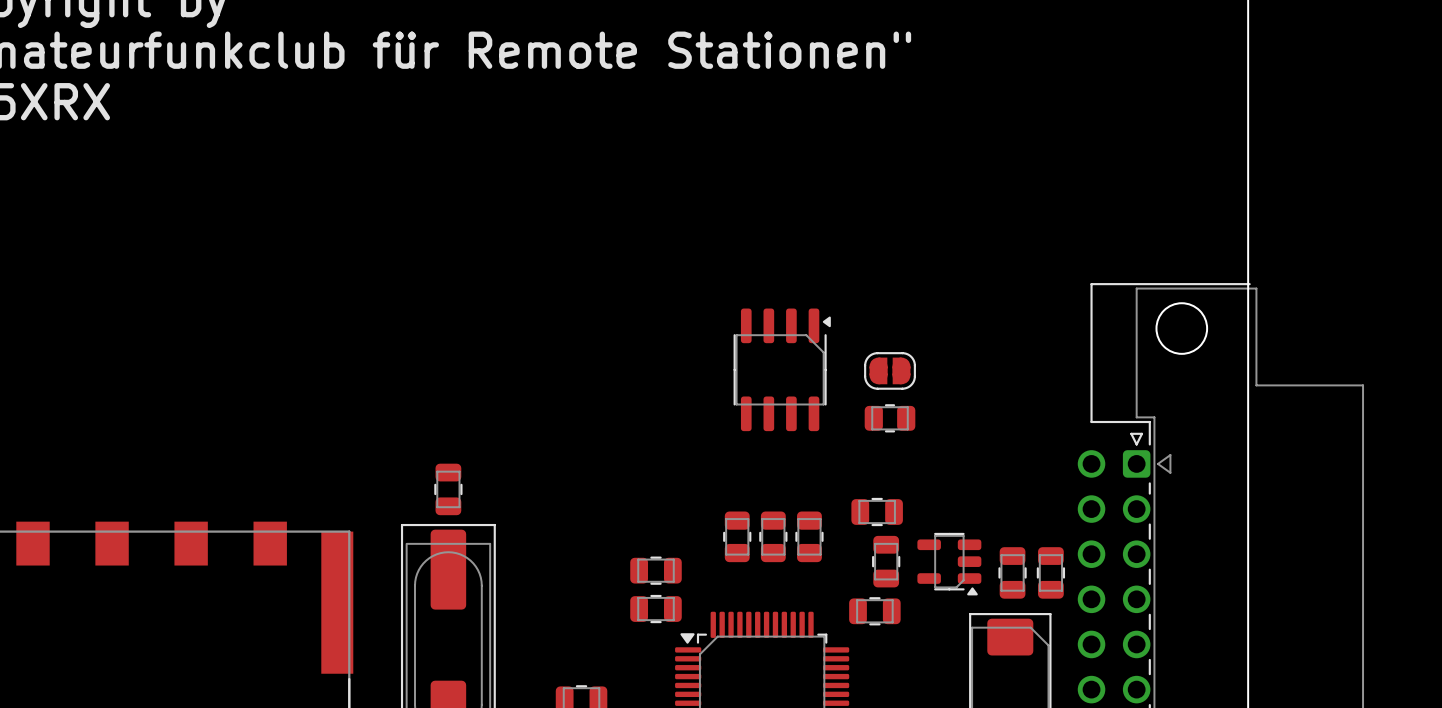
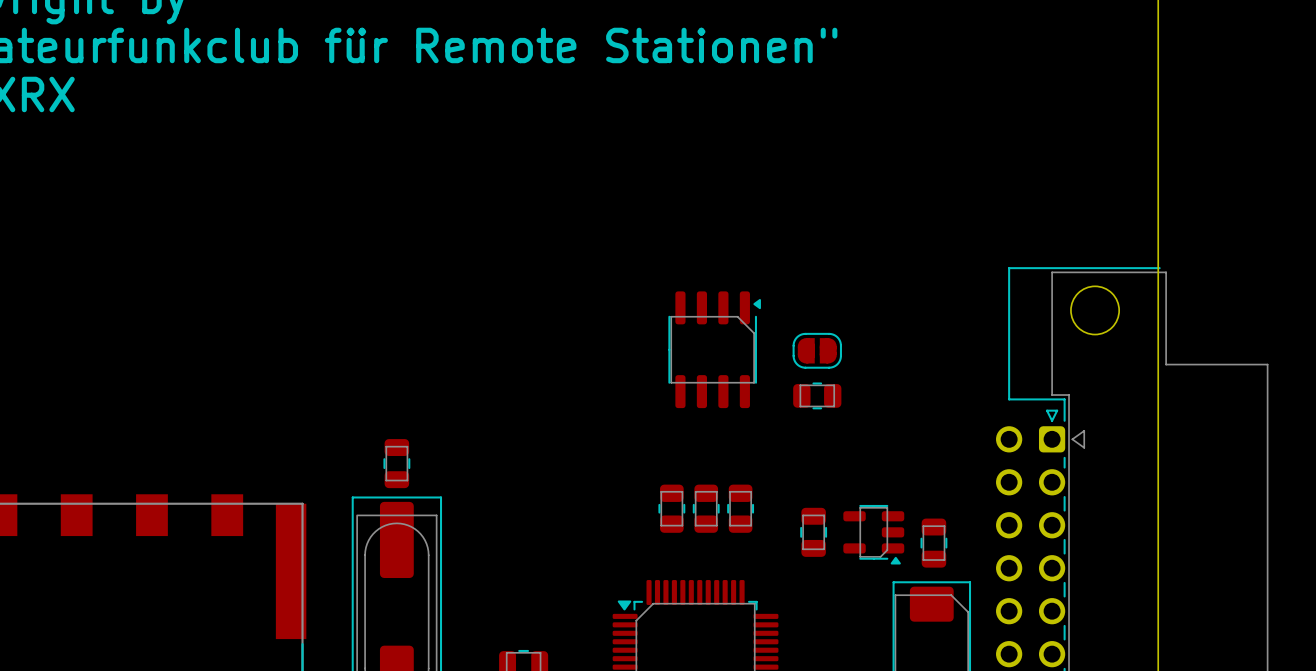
part: (877, 512) -> none
part: (656, 570) -> none
part: (1050, 572) -> none
part: (656, 609) -> none
part: (874, 611) -> none

